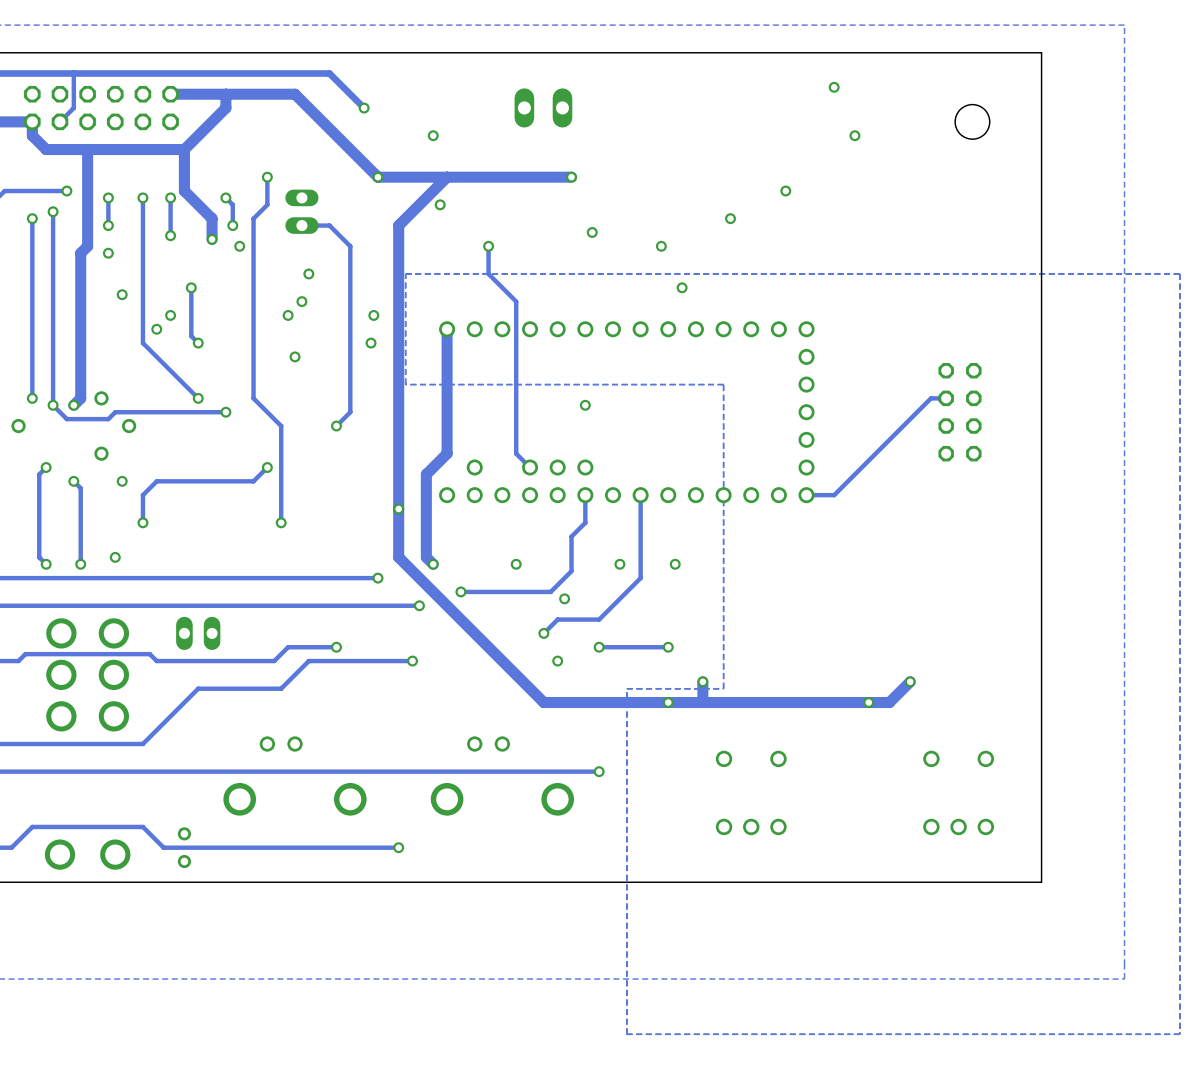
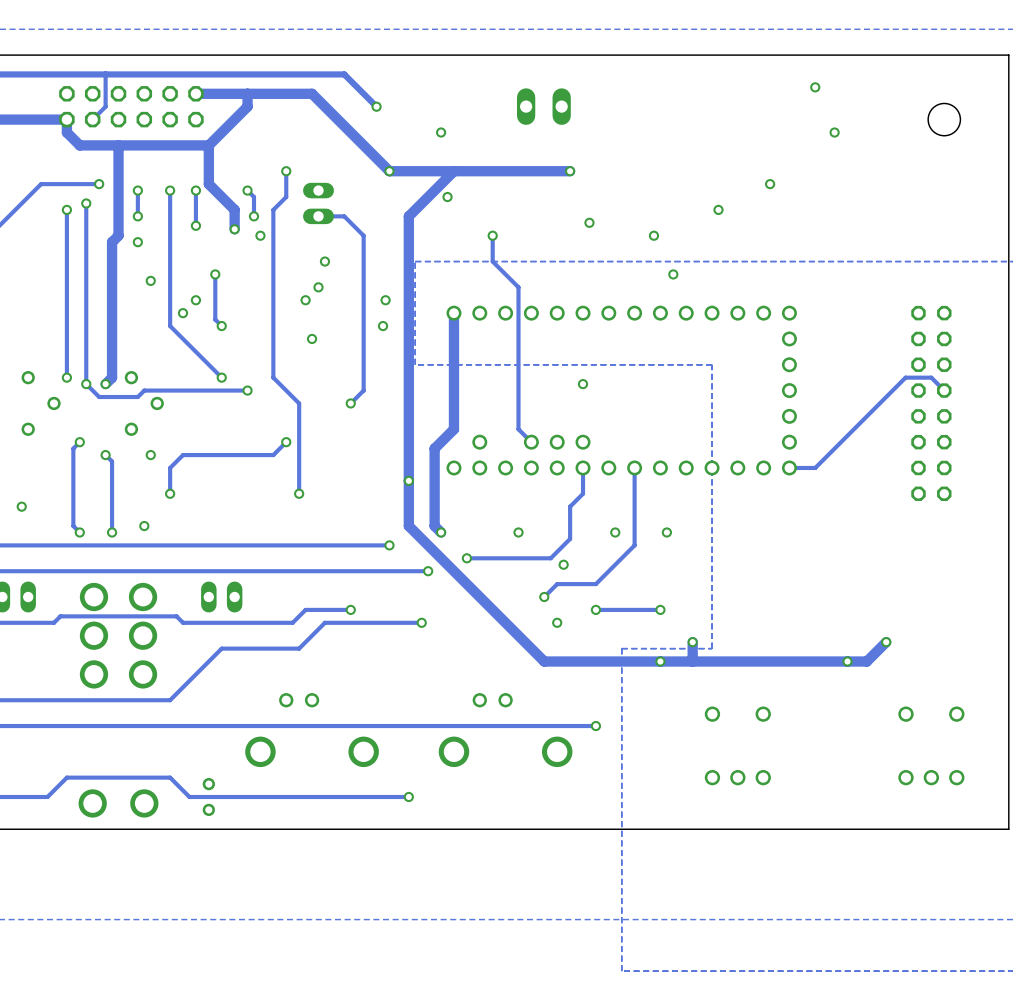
track: none -> (919, 377) (931, 377) (944, 390)
part: (960, 412) -> none
part: none -> (931, 403)

